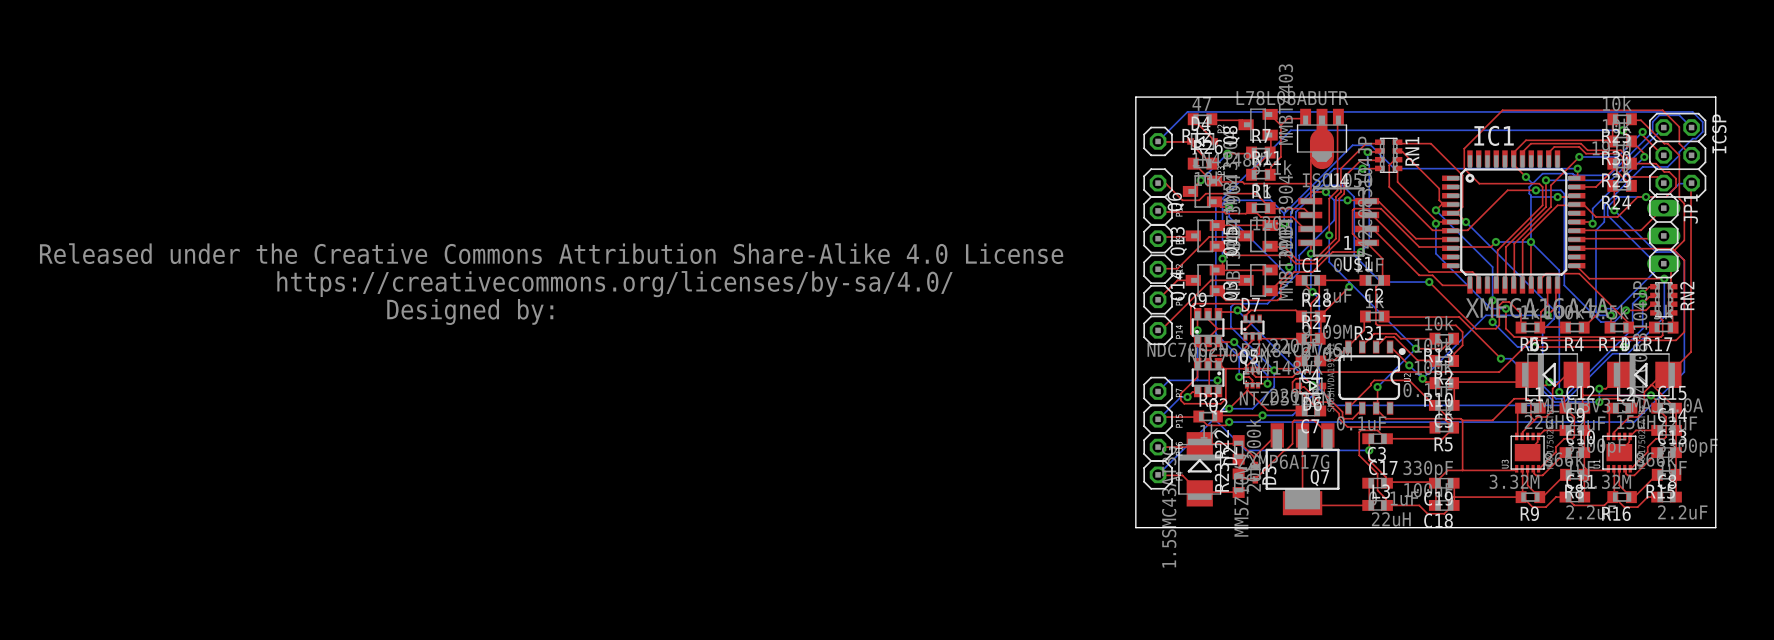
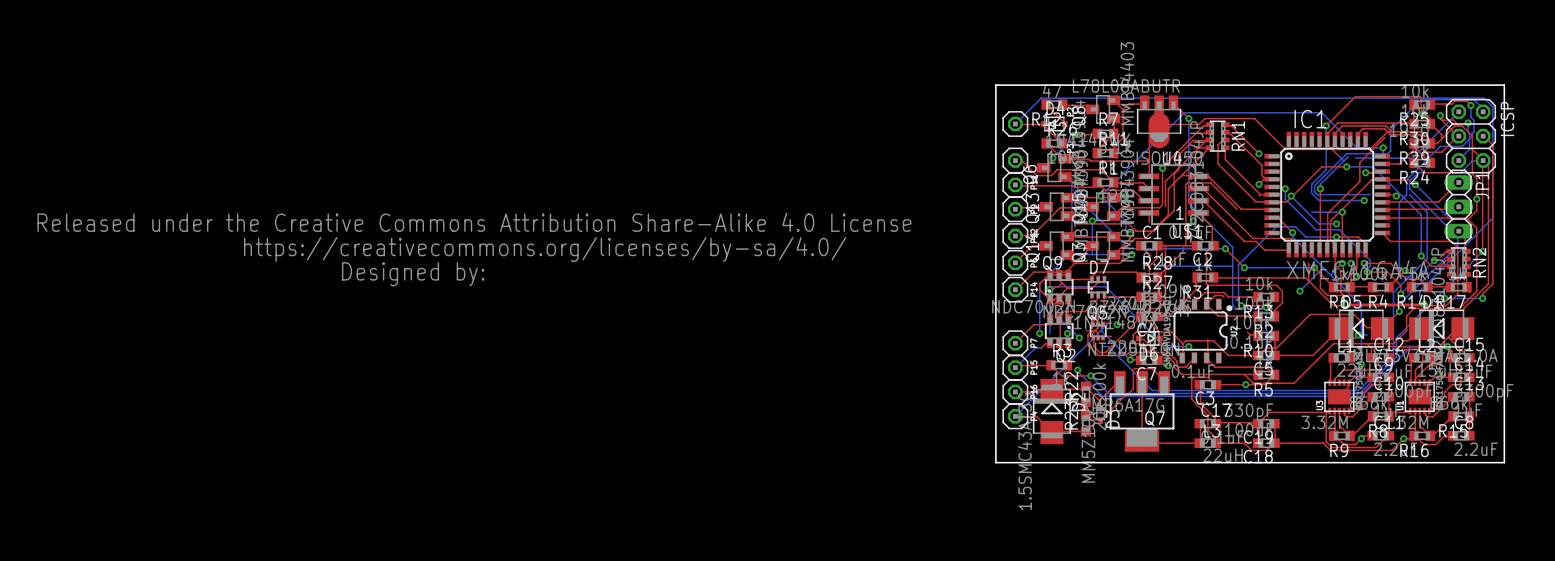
top track: (1545, 110) (1502, 110) (1464, 148) (1464, 168) -> (1355, 96) (1326, 125)
top track: (1619, 110) (1662, 110) (1679, 126) (1679, 143) (1691, 155) -> (1419, 96) (1421, 109) (1430, 118) (1430, 123)
top track: (1338, 116) (1337, 190) (1329, 198) (1329, 207) -> (1206, 140) (1165, 181)
top track: none -> (1173, 102) (1188, 118)
top track: (1631, 119) (1641, 120) (1657, 136) -> (1441, 120) (1453, 120)
top track: none -> (1430, 104) (1451, 104) (1454, 101) (1466, 101) (1470, 105)
via: none -> (1470, 105)
bottom track: (1691, 126) (1679, 115) (1659, 115) (1652, 121) (1652, 131) (1609, 175) (1582, 175) -> (1482, 111) (1482, 108) (1473, 99) (1421, 99) (1390, 130) (1390, 150) (1387, 153)
bottom track: (1622, 130) (1290, 130) (1215, 205) (1215, 333) (1239, 357) (1239, 377) -> none
bottom track: (1642, 131) (1617, 156) (1579, 156) -> none
bottom track: (1702, 131) (1681, 150) -> (1470, 105) (1473, 131)
bottom track: none -> (1492, 115) (1492, 218) (1419, 291) (1419, 296)
bottom track: none -> (1188, 118) (1188, 203) (1232, 247) (1232, 305) (1235, 308) (1266, 308)
via: none -> (1188, 118)
bottom track: none -> (1468, 123) (1469, 149) (1458, 160)
via: none -> (1468, 123)
top track: (1372, 143) (1365, 143) (1340, 168) (1340, 191) (1335, 196) (1335, 238) (1314, 260) (1297, 260) (1284, 247) (1270, 246) -> (1203, 125) (1162, 166) (1162, 204) (1159, 207) (1121, 207) (1113, 215)
top track: (1404, 143) (1430, 143) (1462, 175) (1462, 207) (1457, 212) (1450, 212) (1450, 213) (1455, 212) (1465, 222) -> (1231, 125) (1259, 153)
bottom track: none -> (1326, 125) (1326, 169) (1311, 184) (1311, 193) (1318, 200) (1364, 200)
via: none -> (1326, 125)
top track: none -> (1159, 130) (1159, 124) (1199, 124) (1204, 118) (1254, 118) (1283, 147)
bottom track: (1367, 151) (1369, 243) (1360, 252) -> none
via: (1367, 151) -> none
via: (1579, 156) -> none
bottom track: (1644, 156) (1592, 208) (1592, 223) -> none
via: (1644, 156) -> none
top track: (1639, 163) (1656, 163) (1664, 171) (1669, 171) (1676, 178) (1676, 186) (1666, 196) -> (1437, 143) (1454, 125) (1459, 125)
bottom track: (1362, 168) (1334, 168) (1290, 212) (1290, 265) (1289, 267) -> none
via: (1362, 168) -> none
bottom track: (1547, 168) (1394, 168) (1370, 145) (1352, 145) (1284, 213) (1270, 200) (1225, 200) (1222, 203) -> (1356, 147) (1321, 112) (1184, 112) (1101, 196) (1125, 220) (1125, 232)
top track: (1465, 170) (1479, 183) (1539, 183) (1542, 186) (1542, 205) (1497, 250) (1496, 285) -> (1285, 149) (1330, 149) (1335, 144) (1339, 149) (1370, 149) (1387, 131) (1392, 131)
top track: (1625, 173) (1629, 176) (1657, 176) (1663, 183) -> (1425, 152) (1441, 152) (1457, 136)
via: none -> (1259, 153)
bottom track: (1574, 175) (1572, 173) (1542, 173) (1537, 178) -> (1380, 153) (1346, 153) (1314, 185) (1314, 191) (1317, 194) (1370, 194)
via: (1525, 176) -> none
top track: (1545, 180) (1545, 207) (1505, 247) -> (1320, 188) (1320, 216)
via: (1545, 180) -> none
bottom track: (1529, 186) (1530, 242) (1559, 270) (1559, 307) -> (1285, 188) (1285, 199) (1316, 229) (1339, 229) (1370, 260) (1370, 266) (1367, 269)
bottom track: none -> (1340, 163) (1320, 184) (1320, 188)
top track: (1614, 186) (1614, 210) -> (1415, 163) (1424, 172) (1435, 172)
bottom track: (1560, 190) (1564, 193) (1564, 285) (1600, 322) (1614, 322) (1625, 310) -> (1368, 166) (1373, 166) (1421, 215) (1421, 256)
top track: (1310, 191) (1325, 191) -> none
bottom track: (1325, 191) (1334, 200) -> none
bottom track: (1530, 196) (1557, 196) -> none
top track: (1637, 196) (1617, 217) (1595, 217) (1584, 205) -> (1411, 180) (1389, 180)
via: (1646, 196) -> none
bottom track: (1334, 200) (1334, 220) (1299, 255) (1299, 272) (1267, 303) (1234, 303) (1230, 307) (1230, 327) (1274, 370) (1274, 387) (1252, 408) (1224, 408) -> (1111, 323) (1108, 323) (1073, 358)
bottom track: (1334, 200) (1347, 200) -> none
via: (1347, 200) -> none
top track: (1564, 205) (1557, 205) (1522, 240) (1522, 285) -> (1371, 180) (1330, 220) (1330, 239) (1333, 242) (1334, 250) (1335, 264) (1340, 270) (1340, 292) (1343, 295)
bottom track: (1435, 210) (1492, 267) (1492, 300) -> none
via: none -> (1285, 188)
via: none -> (1320, 188)
bottom track: (1229, 217) (1285, 273) (1292, 273) (1295, 270) (1295, 212) (1322, 185) (1342, 185) (1354, 196) (1354, 255) (1380, 282) (1429, 282) -> (1077, 190) (1077, 197) (1128, 248) (1225, 248)
bottom track: (1465, 222) (1554, 310) (1554, 318) (1542, 330) (1542, 385) (1555, 398) (1562, 398) (1632, 328) (1632, 303) (1642, 293) -> none
via: (1465, 222) -> none
bottom track: none -> (1409, 194) (1427, 212) (1427, 258) (1393, 292) (1393, 355) (1358, 390) (1152, 390) (1108, 346) (1102, 346)
via: none -> (1101, 196)
bottom track: (1435, 223) (1435, 253) (1490, 308) (1505, 308) -> none
via: (1435, 223) -> none
bottom track: none -> (1291, 196) (1318, 223) (1336, 223)
via: none -> (1291, 196)
via: none -> (1476, 199)
via: none -> (1364, 200)
top track: (1352, 233) (1360, 242) (1367, 242) -> (1185, 204) (1185, 245)
bottom track: (1329, 235) (1329, 262) (1415, 348) (1377, 387) -> none
via: (1329, 235) -> none
top track: (1410, 238) (1419, 247) (1450, 248) (1490, 247) (1495, 242) -> none
via: (1495, 242) -> none
top track: none -> (1271, 217) (1278, 218) (1292, 232)
bottom track: none -> (1092, 220) (1092, 254)
via: none -> (1092, 220)
top track: (1360, 252) (1332, 252) (1312, 272) (1305, 272) -> (1209, 147) (1168, 188) (1168, 215) (1144, 238)
bottom track: (1656, 252) (1676, 252) (1684, 260) (1684, 372) (1634, 422) (1229, 422) -> (1411, 346) (1361, 396) (1102, 396) (1077, 370)
bottom track: (1310, 253) (1310, 290) (1319, 298) (1319, 388) -> none
via: (1310, 253) -> none
via: none -> (1336, 223)
via: (1222, 258) -> none
bottom track: (1662, 263) (1617, 308) (1602, 308) -> (1457, 231) (1457, 245) (1399, 304) (1399, 311)
bottom track: none -> (1292, 232) (1292, 237) (1361, 305) (1361, 364) (1356, 368) (1356, 383)
via: none -> (1292, 232)
bottom track: none -> (1336, 237) (1305, 237) (1295, 226) (1276, 226) (1238, 264) (1238, 302)
via: none -> (1336, 237)
top track: (1585, 275) (1589, 278) (1664, 278) -> (1390, 241) (1451, 241) (1457, 247) (1457, 280)
bottom track: (1664, 278) (1664, 317) (1627, 353) (1612, 353) (1564, 402) (1554, 402) (1510, 358) (1500, 358) -> none
via: (1664, 278) -> none
top track: (1246, 280) (1210, 280) (1159, 330) -> (1092, 245) (1066, 272) (1033, 272) (1016, 289)
top track: none -> (1165, 245) (1165, 302) (1159, 308) (1149, 308) (1142, 315)
top track: (1429, 282) (1475, 328) (1495, 328) (1499, 325) (1499, 305) (1502, 302) (1509, 302) (1520, 313) (1520, 327) -> (1314, 267) (1333, 286)
via: (1429, 282) -> none
top track: none -> (1225, 248) (1244, 267)
via: none -> (1225, 248)
top track: (1539, 285) (1540, 278) (1545, 273) (1579, 273) (1627, 322) (1627, 327) -> (1364, 263) (1390, 263) (1406, 279) (1419, 279) (1427, 286)
top track: (1557, 285) (1555, 307) (1547, 315) -> (1365, 250) (1364, 242) (1358, 237) (1336, 237)
via: (1349, 287) -> none
top track: (1691, 287) (1691, 335) -> (1483, 136) (1492, 144) (1492, 283) (1482, 294)
bottom track: none -> (1482, 251) (1396, 337) (1396, 356) (1359, 393) (1108, 393) (1090, 375)
via: none -> (1482, 251)
bottom track: none -> (1131, 254) (1068, 254) (1039, 283) (1039, 333)
via: none -> (1131, 254)
via: (1312, 292) -> none
via: none -> (1421, 256)
via: (1642, 293) -> none
bottom track: none -> (1434, 260) (1400, 294)
via: none -> (1434, 260)
via: (1492, 300) -> none
bottom track: none -> (1342, 263) (1330, 275)
via: none -> (1342, 263)
via: none -> (1351, 263)
via: none -> (1364, 263)
bottom track: none -> (1158, 266) (1232, 266)
bottom track: (1642, 303) (1642, 328) (1624, 347) -> none
via: (1642, 303) -> none
top track: (1655, 304) (1646, 310) (1625, 310) -> (1451, 266) (1431, 266) (1421, 256)
bottom track: none -> (1244, 267) (1314, 267)
via: none -> (1244, 267)
via: none -> (1314, 267)
bottom track: none -> (1323, 267) (1299, 291)
via: (1505, 308) -> none
top track: (1237, 310) (1218, 313) -> none
bottom track: (1237, 310) (1312, 385) -> none
via: (1237, 310) -> none
top track: none -> (1367, 272) (1387, 272) (1400, 285) (1400, 294)
bottom track: (1559, 310) (1559, 392) -> none
via: none -> (1367, 272)
via: (1625, 310) -> none
top track: (1249, 312) (1240, 303) (1194, 303) (1190, 307) (1190, 333) (1199, 342) (1199, 347) (1202, 350) (1212, 350) (1220, 342) (1218, 341) (1234, 342) -> none
bottom track: (1547, 315) (1485, 315) (1422, 378) (1409, 365) -> none
via: (1610, 315) -> none
top track: (1459, 317) (1500, 358) -> none
top track: none -> (1091, 279) (1068, 279) (1064, 275) (1048, 275) (1039, 283) (1039, 289) (1049, 299) (1054, 299) (1057, 296) (1056, 293)
bottom track: (1492, 322) (1517, 347) (1534, 347) -> none
via: (1492, 322) -> none
top track: none -> (1061, 283) (1051, 291) (1051, 293)
bottom track: none -> (1045, 286) (1105, 286) (1168, 349) (1171, 346) (1188, 346)
via: none -> (1299, 291)
top track: none -> (1061, 294) (1061, 296) (1051, 307) (1051, 324) (1033, 324) (1015, 343)
via: none -> (1400, 294)
top track: (1574, 337) (1661, 337) -> (1279, 277) (1305, 277) (1333, 305) (1446, 305) (1456, 295)
top track: (1395, 338) (1417, 360) -> (1206, 304) (1218, 315) (1242, 315)
bottom track: none -> (1444, 298) (1482, 298)
via: none -> (1444, 298)
top track: (1676, 340) (1530, 340) (1499, 372) (1297, 372) (1292, 377) (1255, 377) (1252, 373) -> (1156, 352) (1098, 355) (1087, 345) (1087, 334) (1098, 327)
top track: (1691, 340) (1691, 352) (1669, 373) -> (1472, 149) (1488, 165) (1488, 283) (1463, 308) (1463, 327)
via: none -> (1482, 298)
bottom track: (1234, 342) (1267, 375) (1267, 383) -> none
via: (1234, 342) -> none
top track: (1390, 346) (1409, 365) -> none
bottom track: none -> (1266, 307) (1266, 365)
via: none -> (1266, 307)
via: none -> (1399, 311)
via: (1500, 358) -> none
bottom track: none -> (1057, 315) (1079, 337)
top track: none -> (1141, 316) (1144, 317) (1159, 332) (1171, 332) (1182, 343)
top track: (1197, 363) (1197, 377) (1180, 393) (1180, 400) (1184, 403) (1220, 403) (1225, 398) (1225, 368) -> none
top track: (1218, 363) (1224, 368) (1247, 369) -> none
via: (1409, 365) -> none
top track: (1267, 368) (1294, 368) -> (1093, 342) (1093, 346) (1099, 352) (1105, 352) (1134, 323)
via: (1239, 377) -> none
bottom track: none -> (1101, 330) (1130, 359)
via: (1422, 378) -> none
bottom track: (1217, 380) (1169, 380) (1158, 391) -> none
top track: (1454, 382) (1520, 382) -> (1275, 355) (1313, 355) (1333, 334)
via: (1267, 383) -> none
via: none -> (1079, 337)
via position: (1377, 387) -> (1188, 346)
bottom track: (1319, 388) (1292, 415) (1262, 415) -> none
bottom track: (1319, 388) (1335, 405) (1565, 405) (1569, 402) (1599, 402) (1599, 388) -> none
via: (1599, 388) -> none
top track: none -> (1182, 343) (1182, 356)
via: (1559, 392) -> none
via position: (1187, 397) -> (1039, 333)
top track: (1514, 398) (1527, 398) (1530, 402) (1530, 417) (1534, 420) -> (1327, 349) (1333, 343) (1393, 343) (1406, 330) (1406, 315) (1413, 308) (1459, 308) (1469, 298)
via: (1599, 402) -> none
top track: none -> (1422, 352) (1422, 362) (1415, 370) (1415, 378)
top track: (1434, 405) (1409, 380) (1374, 380) (1349, 407) -> (1257, 355) (1228, 355) (1213, 340) (1185, 340) (1182, 343)
top track: (1435, 405) (1449, 418) (1462, 420) -> (1259, 355) (1266, 348) (1276, 348) (1310, 314) (1354, 314) (1367, 327) (1382, 328) (1399, 311)
top track: (1229, 408) (1247, 390) (1267, 410) (1289, 410) -> none
via: (1229, 408) -> none
via: none -> (1130, 359)
top track: (1262, 415) (1217, 416) -> none
via: (1262, 415) -> none
via: none -> (1361, 364)
via: none -> (1168, 365)
bottom track: (1214, 418) (1245, 450) (1369, 450) -> none
top track: (1462, 420) (1492, 420) -> (1244, 374) (1253, 383) (1294, 383) (1308, 368)
top track: (1462, 420) (1462, 470) -> none
top track: (1229, 422) (1225, 425) (1207, 425) -> (1090, 375) (1061, 375) (1058, 372)
top track: (1532, 422) (1537, 417) (1545, 417) (1552, 410) (1552, 388) (1565, 375) (1576, 374) (1582, 380) (1584, 430) -> (1343, 370) (1380, 370)
via: none -> (1090, 375)
via: none -> (1245, 384)
via: (1369, 450) -> none
top track: none -> (1326, 412) (1326, 441) (1332, 447) (1375, 447) (1388, 435)
top track: (1454, 497) (1521, 497) -> none
top track: (1565, 497) (1574, 505) (1604, 505) (1609, 500) -> (1275, 443) (1323, 443) (1330, 450) (1392, 450) (1403, 438) (1411, 438)
via: none -> (1361, 438)
via: none -> (1403, 438)

